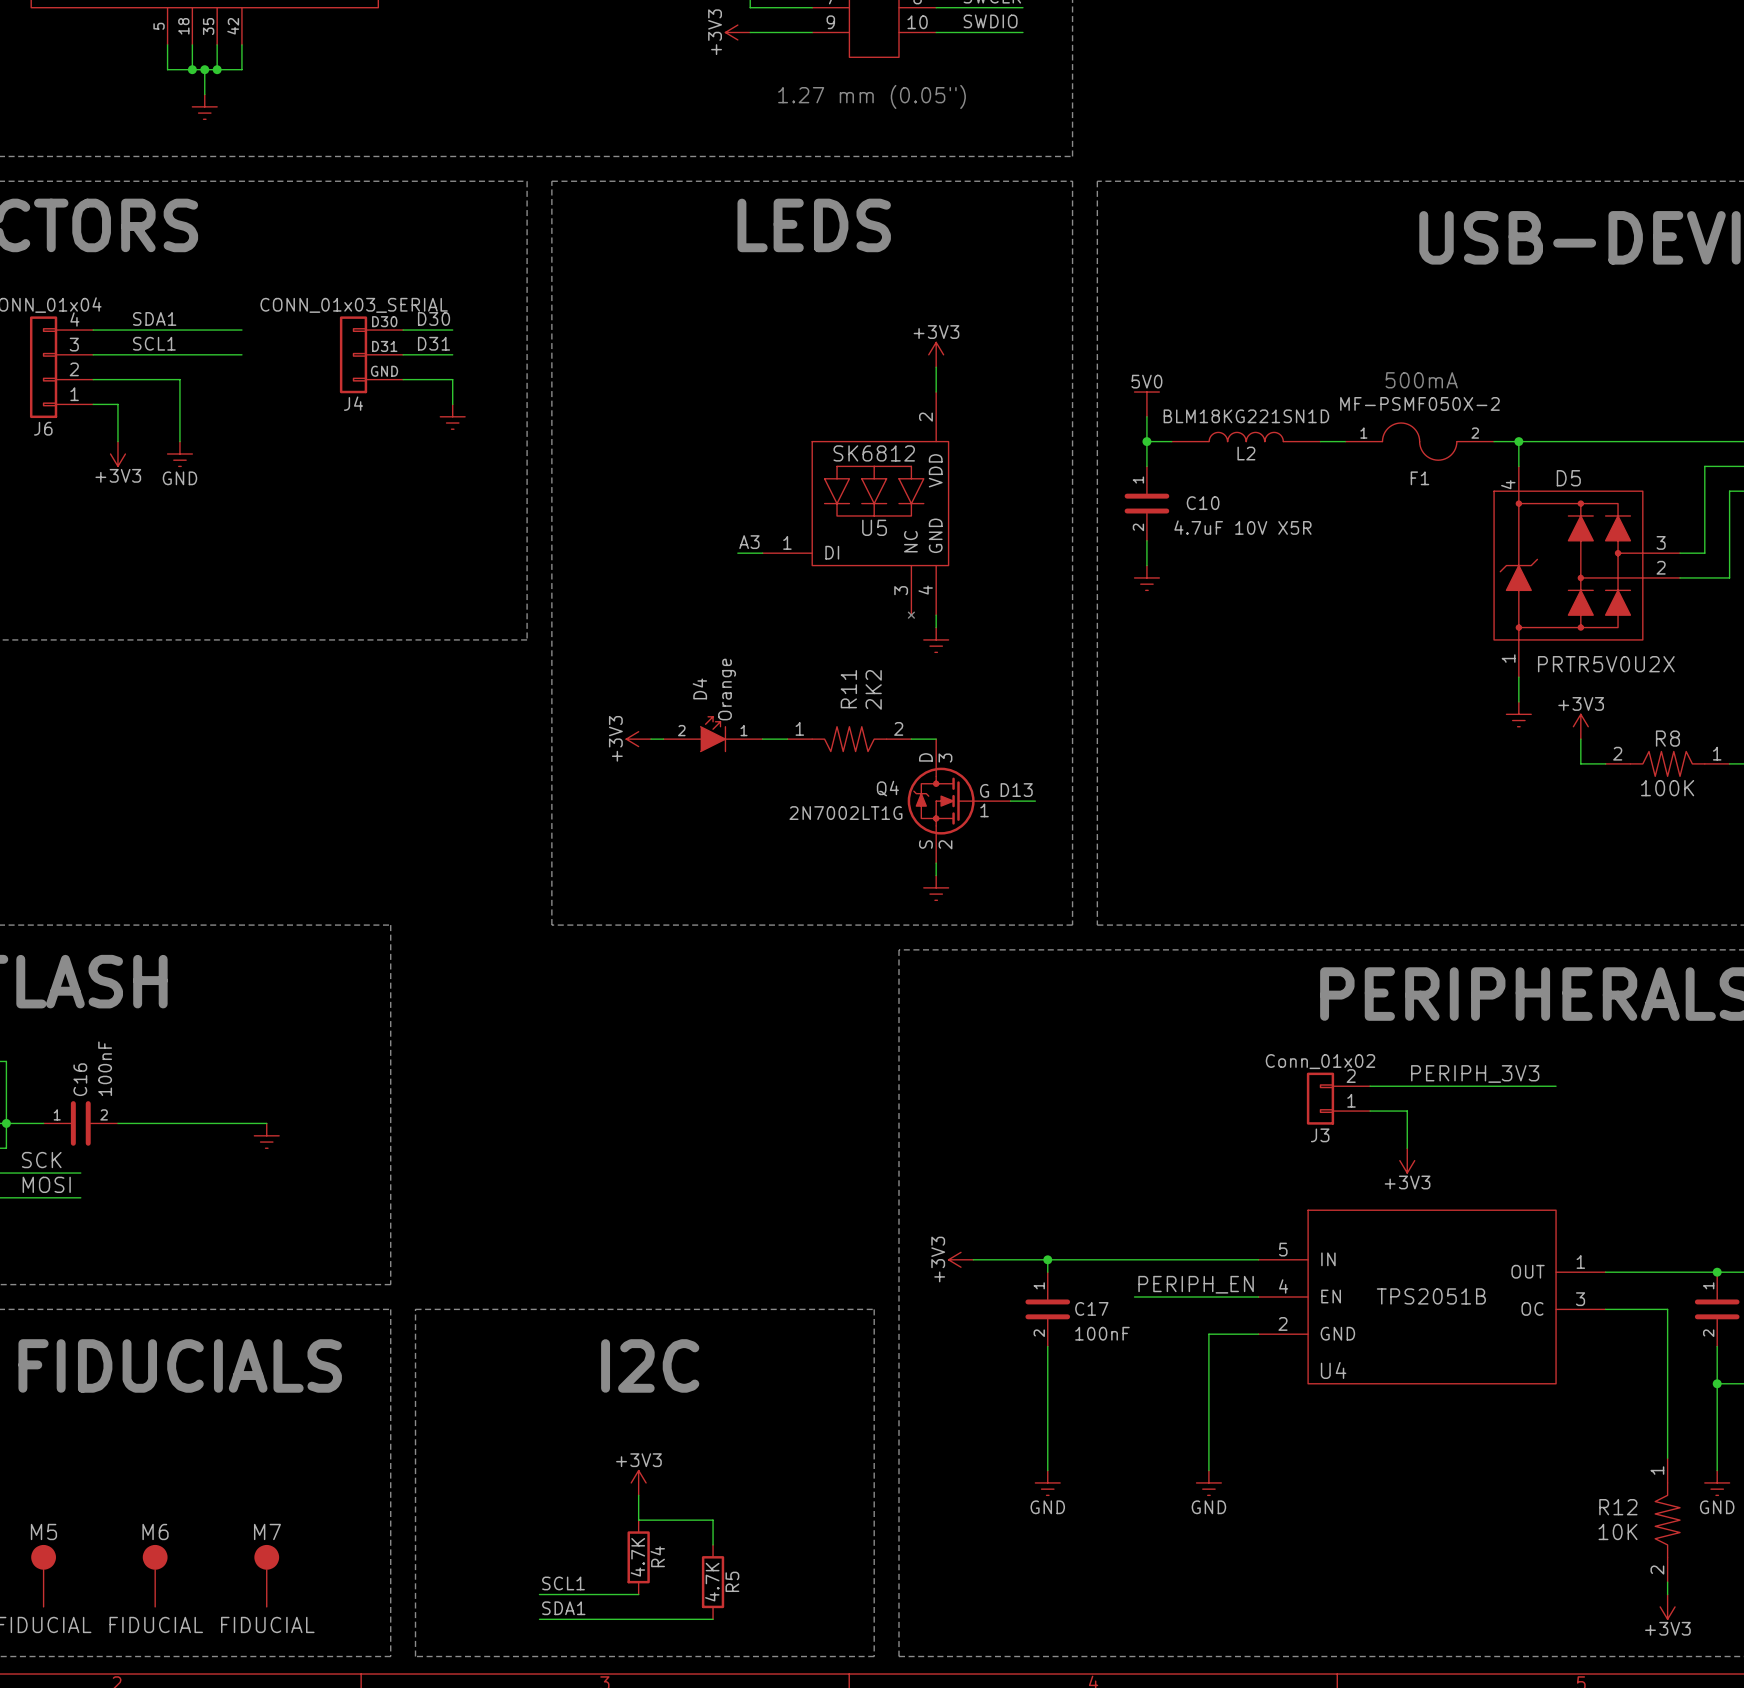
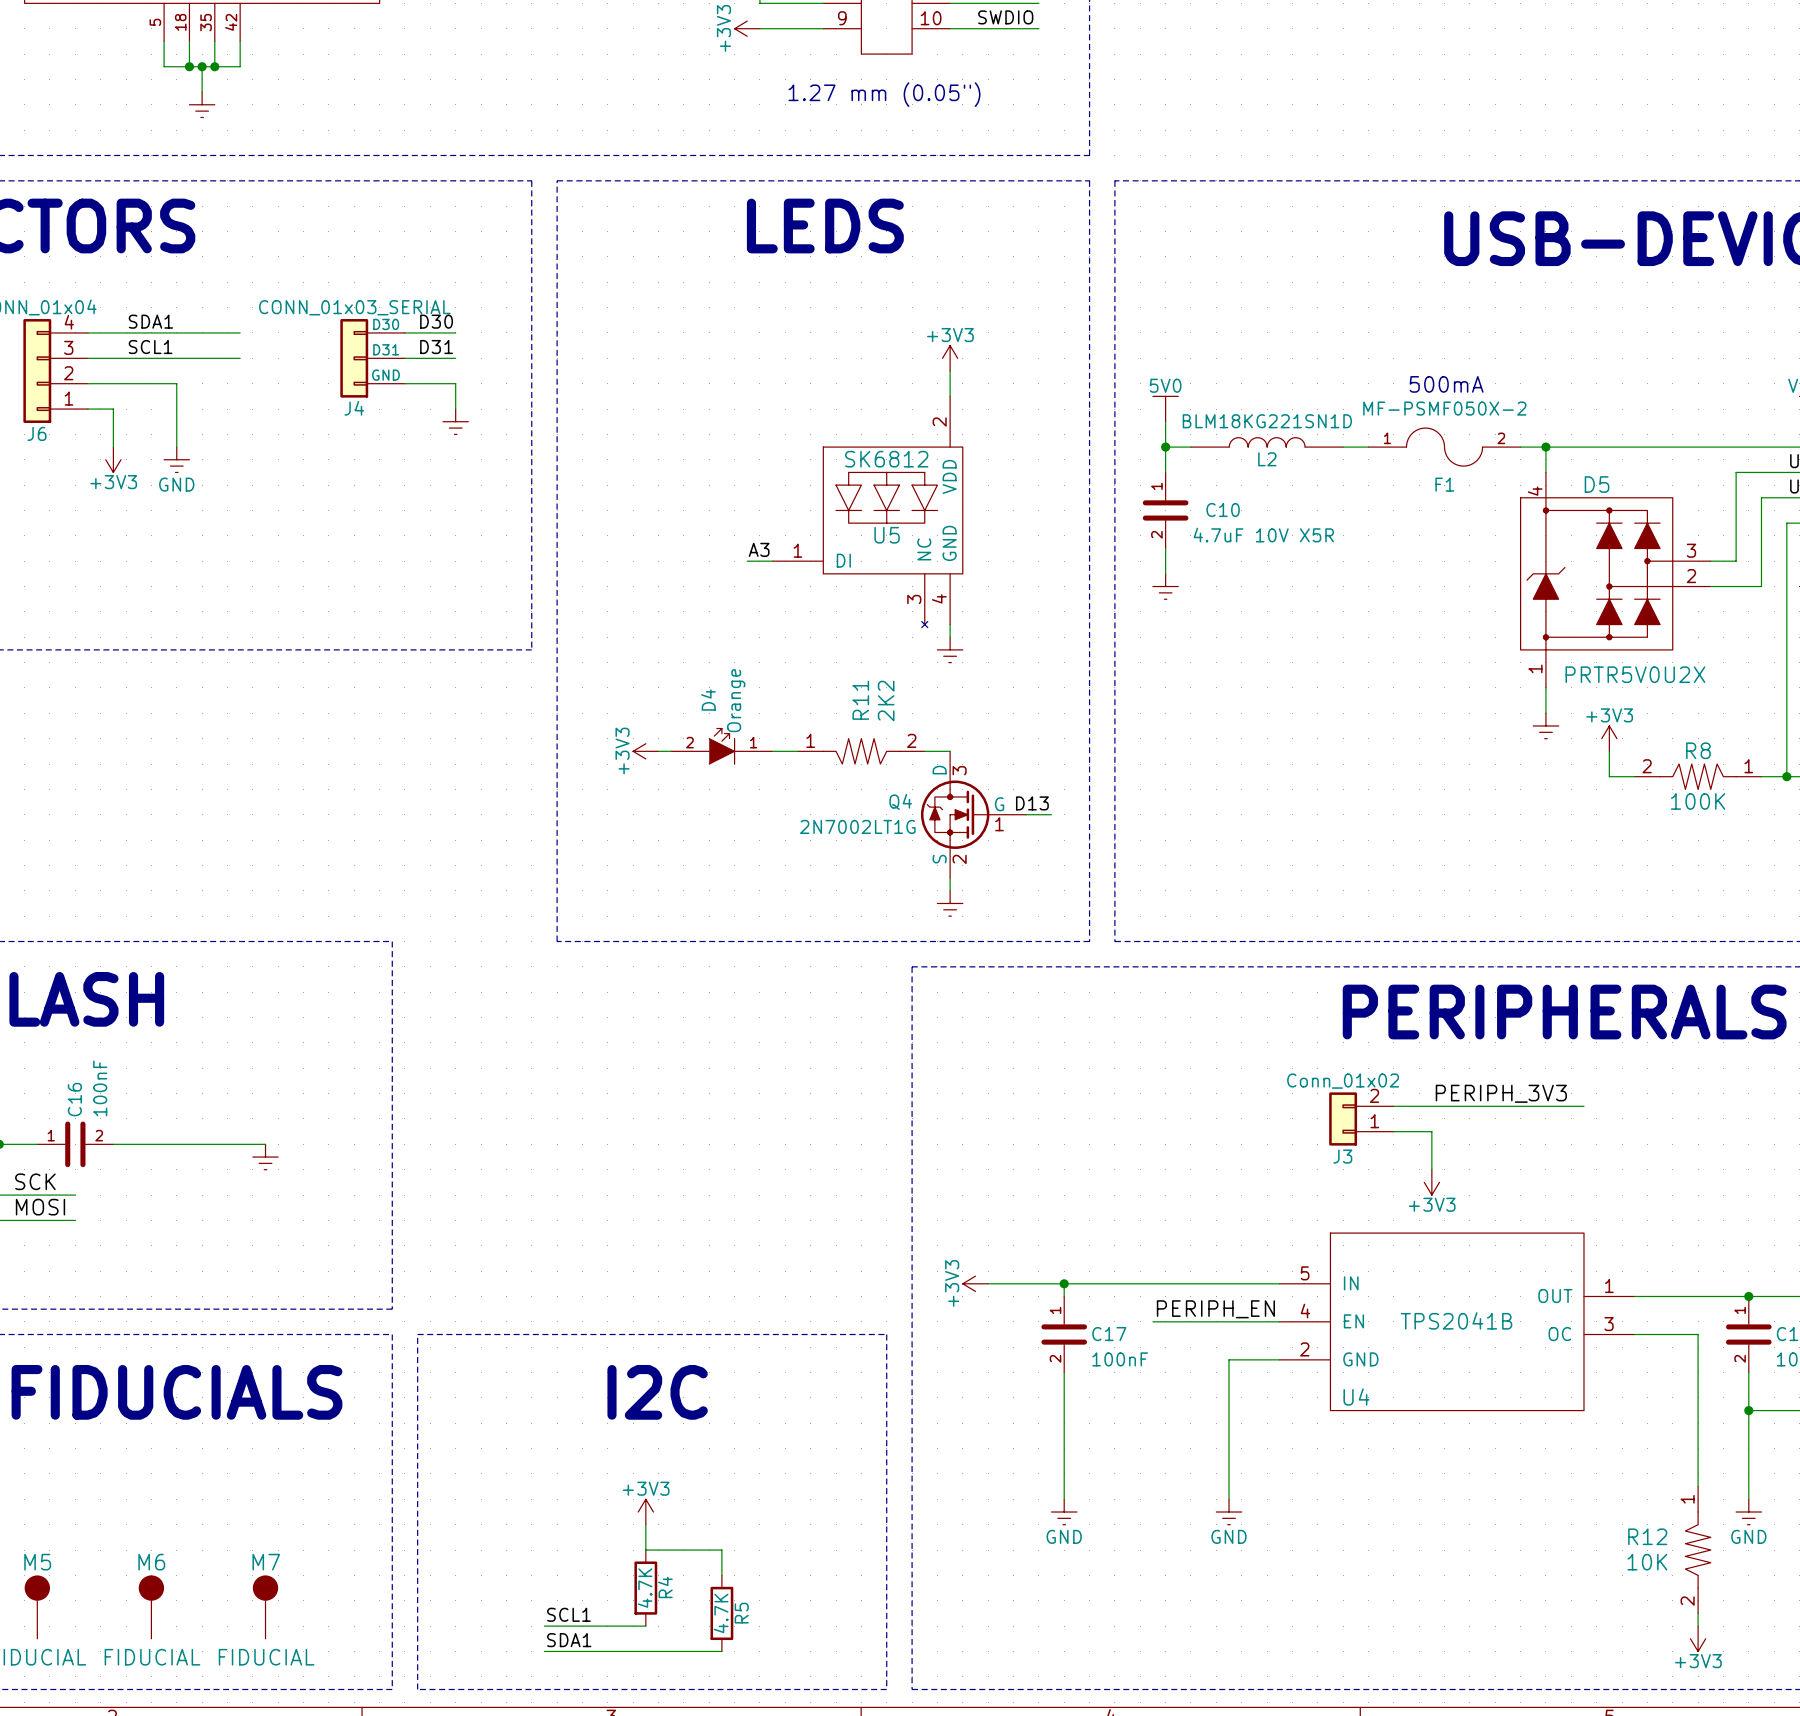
U4 value: TPS2051B (1431, 1296) -> TPS2041B (1456, 1320)

